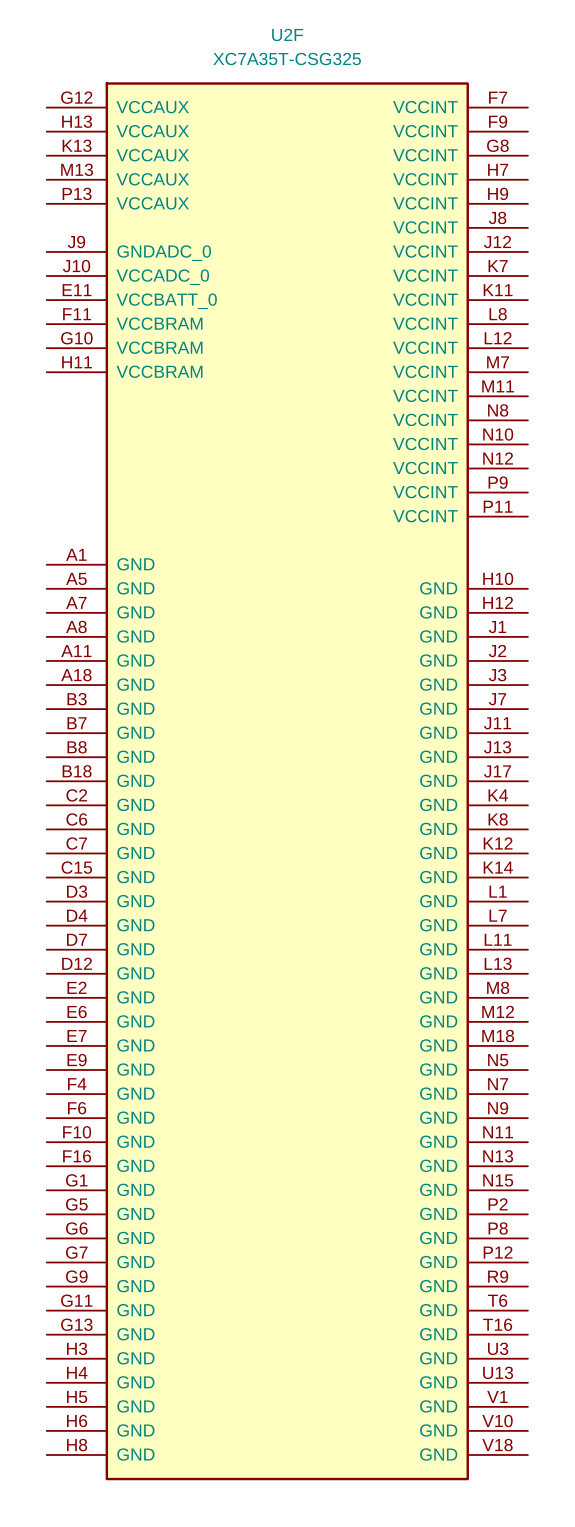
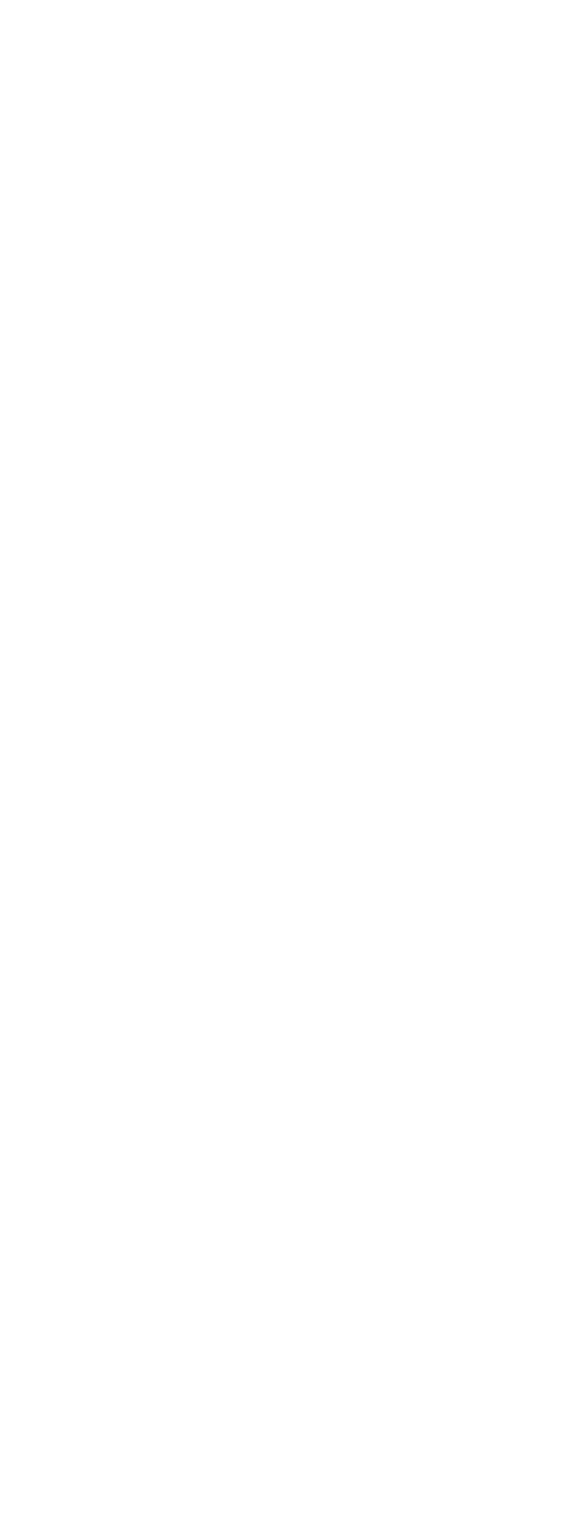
U2F: XC7A35T-CSG325 (287, 781) -> none

